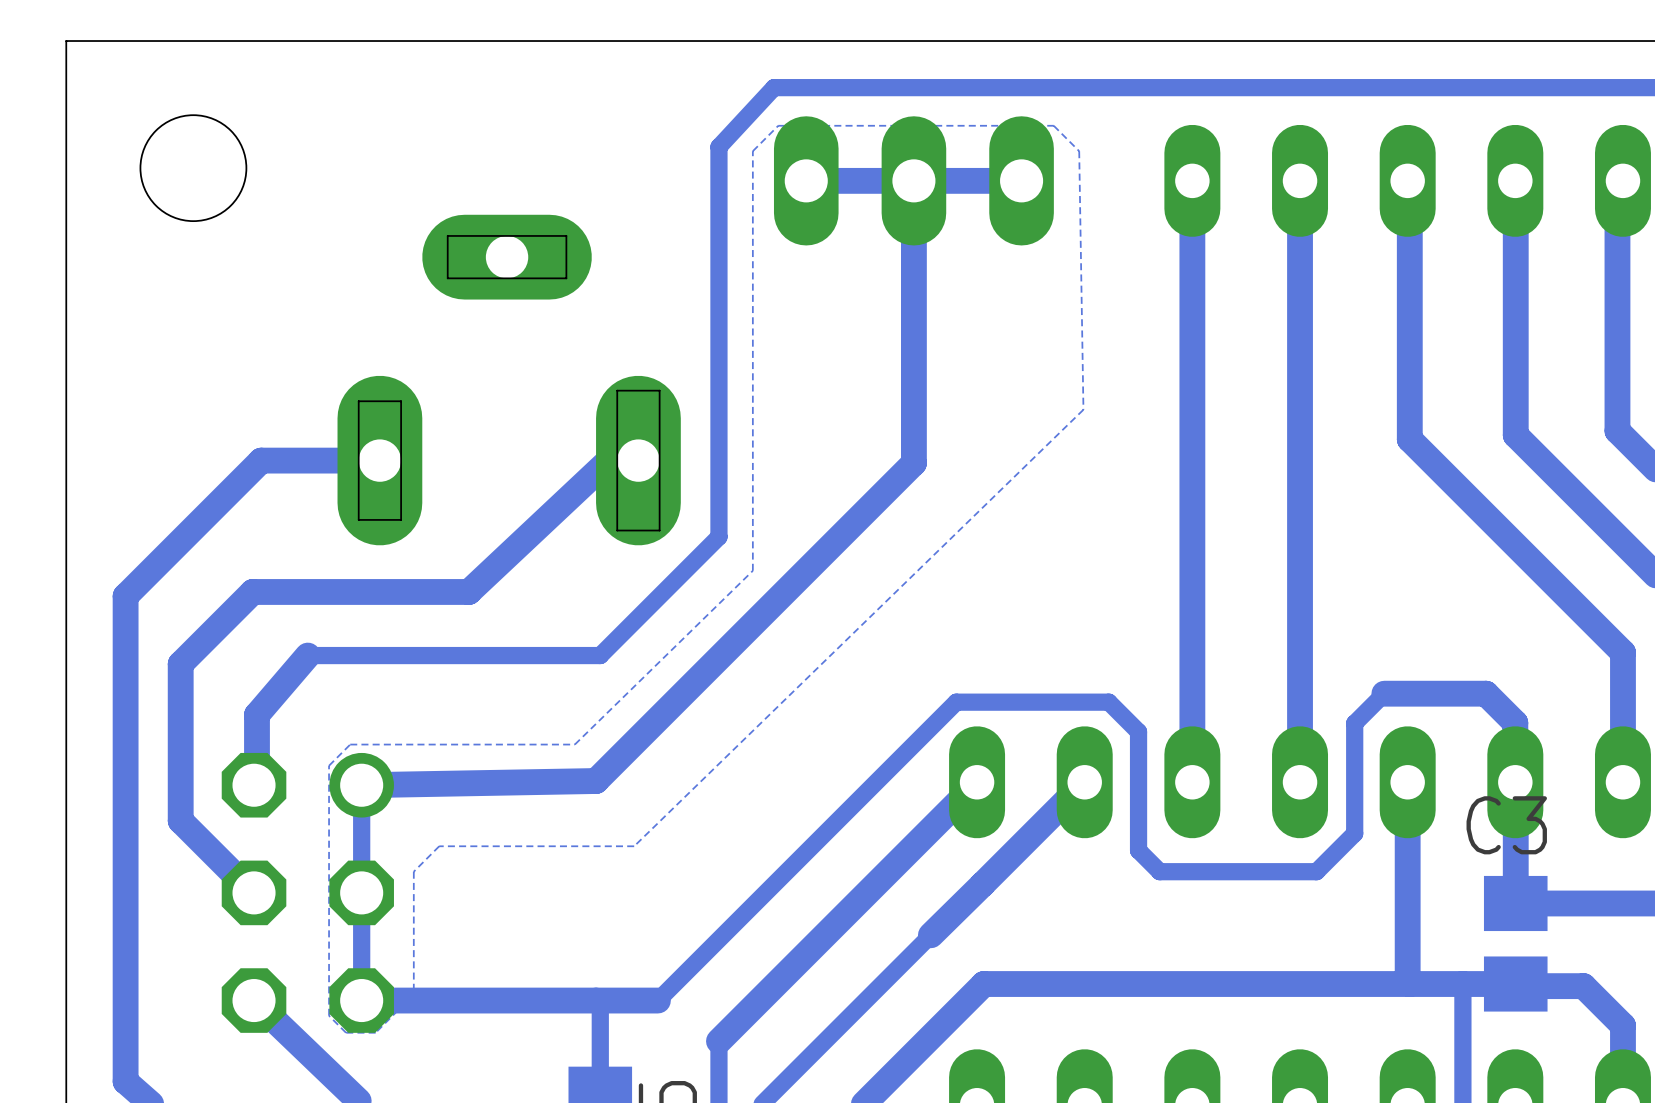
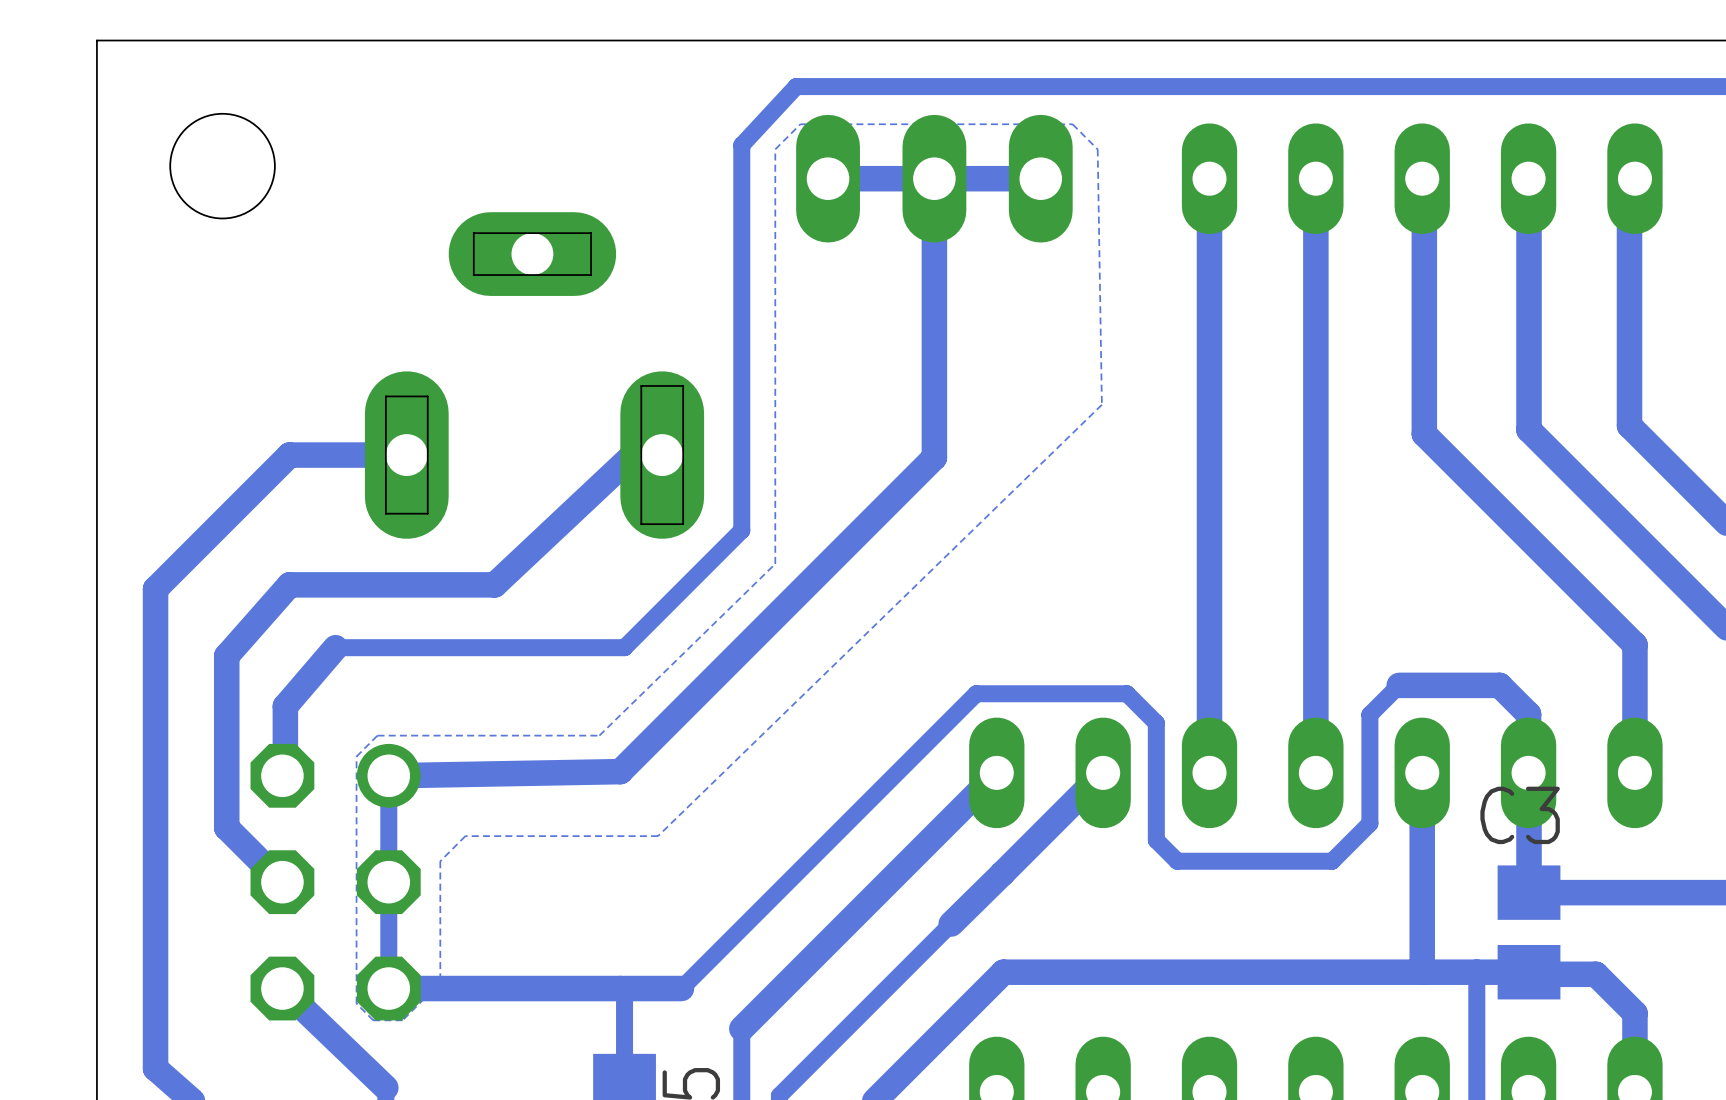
track: (261, 591) (252, 591) (180, 664) (180, 820) (197, 837) -> (289, 584) (226, 656) (226, 827)

